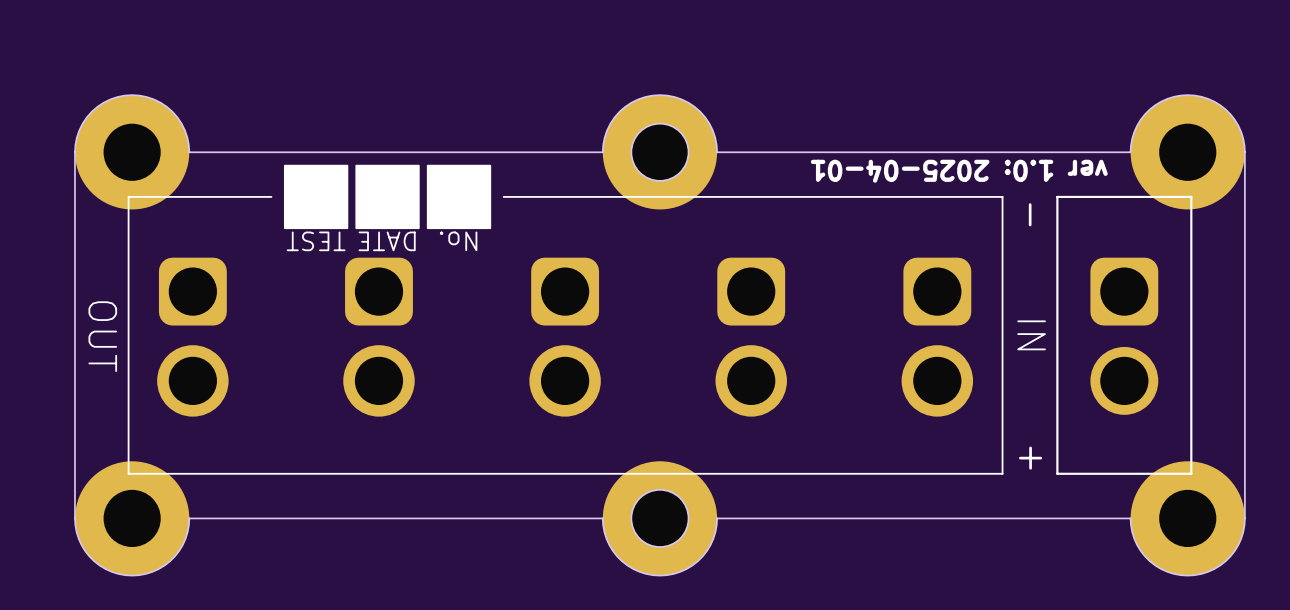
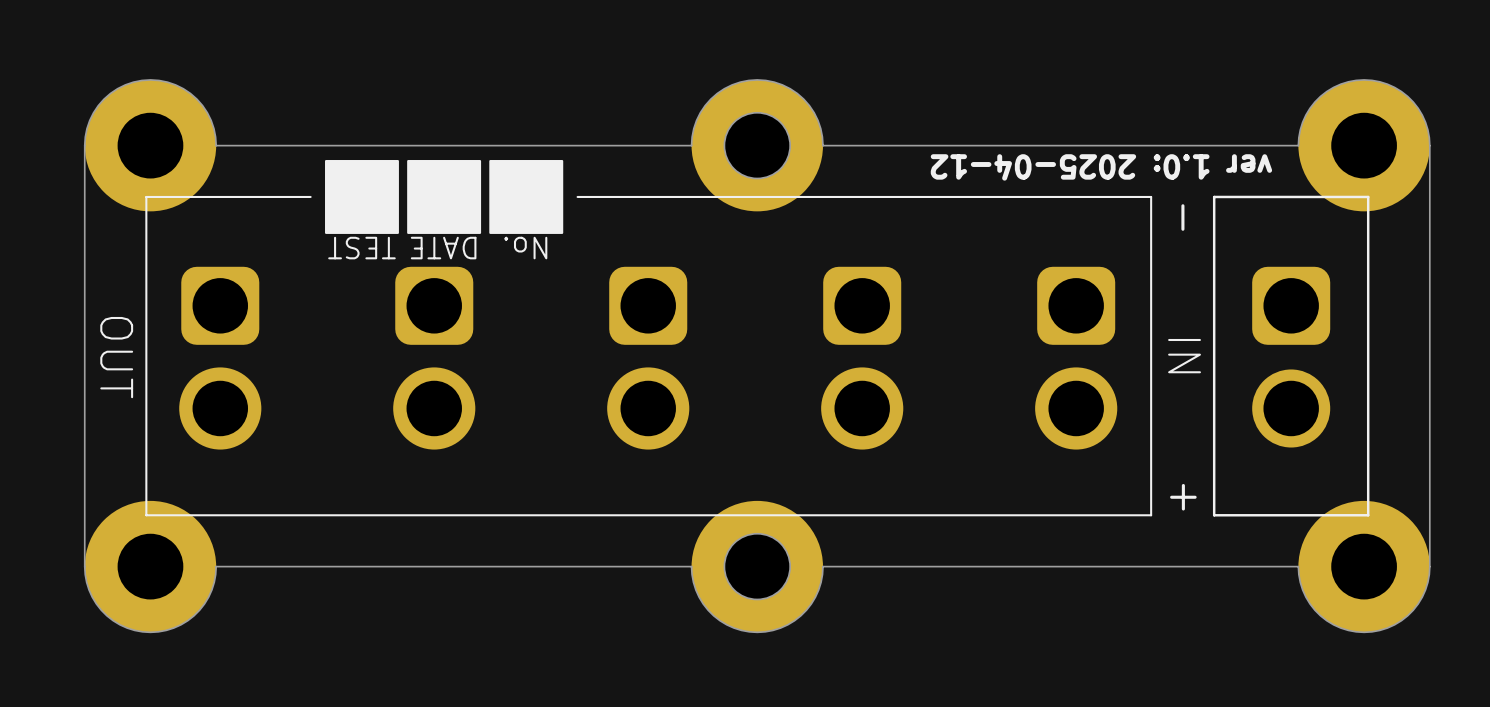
text: ver 1.0: 2025-04-01 (959, 171) -> ver 1.0: 2025-04-12 (1101, 167)

